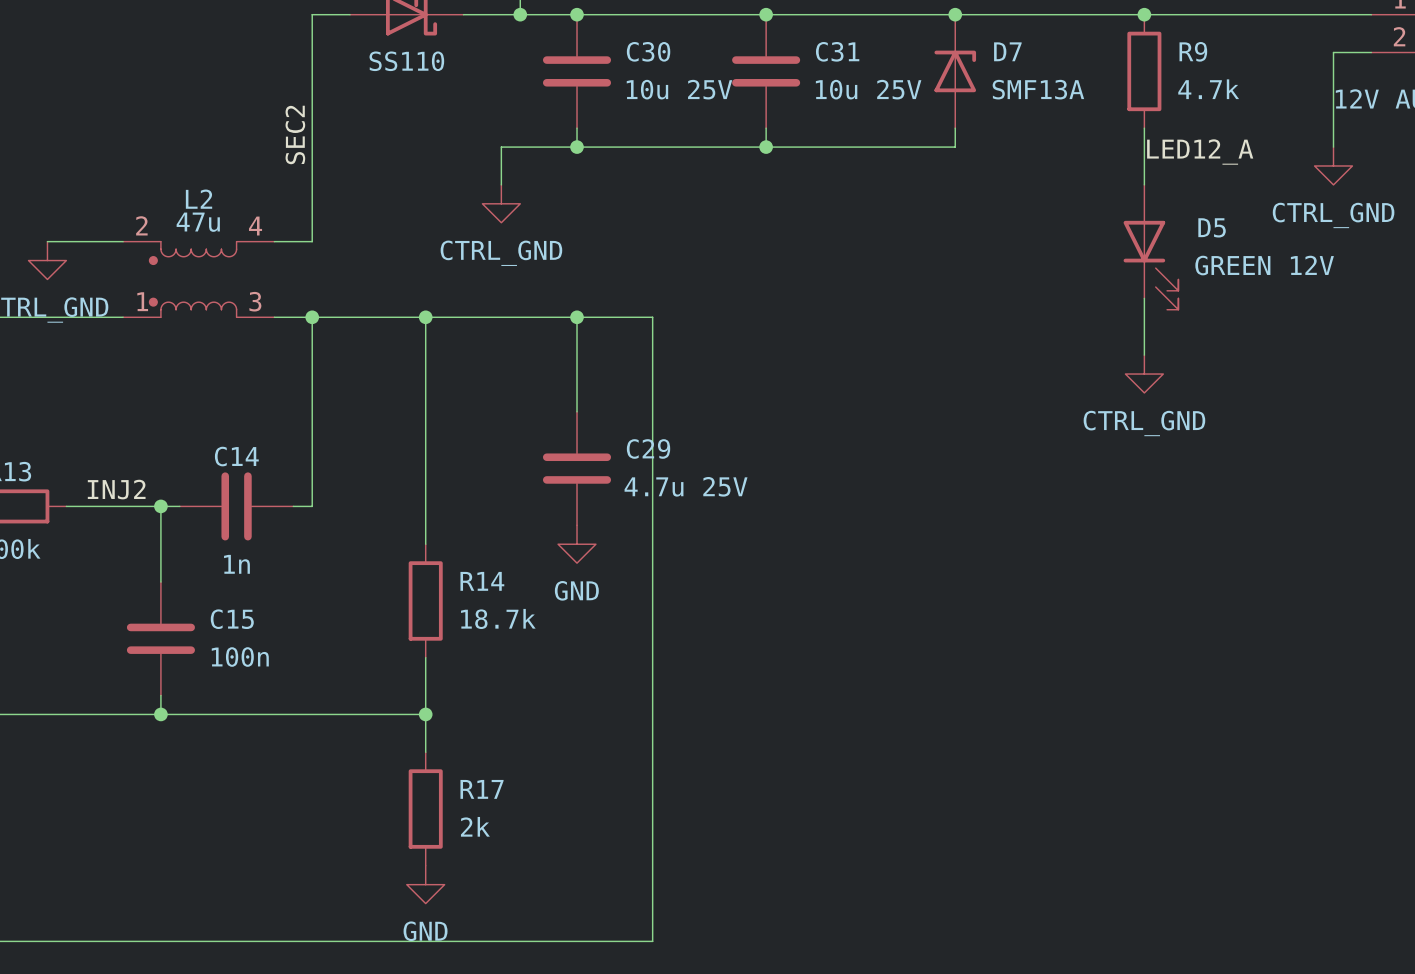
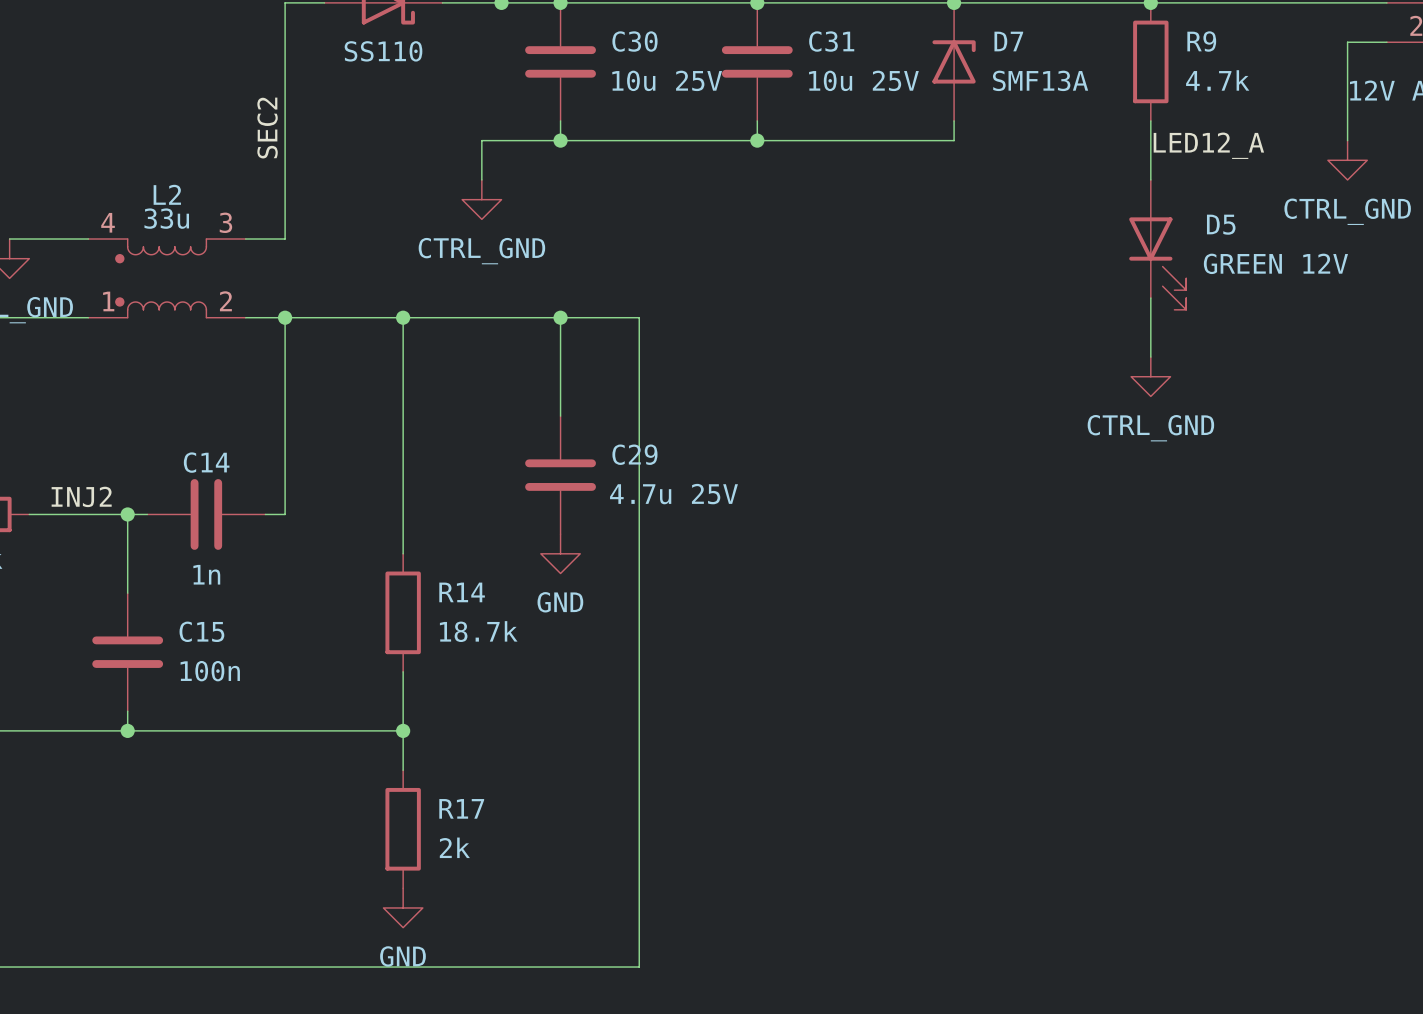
L2 value: 47u (198, 222) -> 33u (166, 218)
L2 pin number: 2 (141, 225) -> 4 (108, 222)
L2 pin number: 4 (255, 226) -> 3 (225, 222)
L2 pin number: 3 (255, 301) -> 2 (225, 301)

